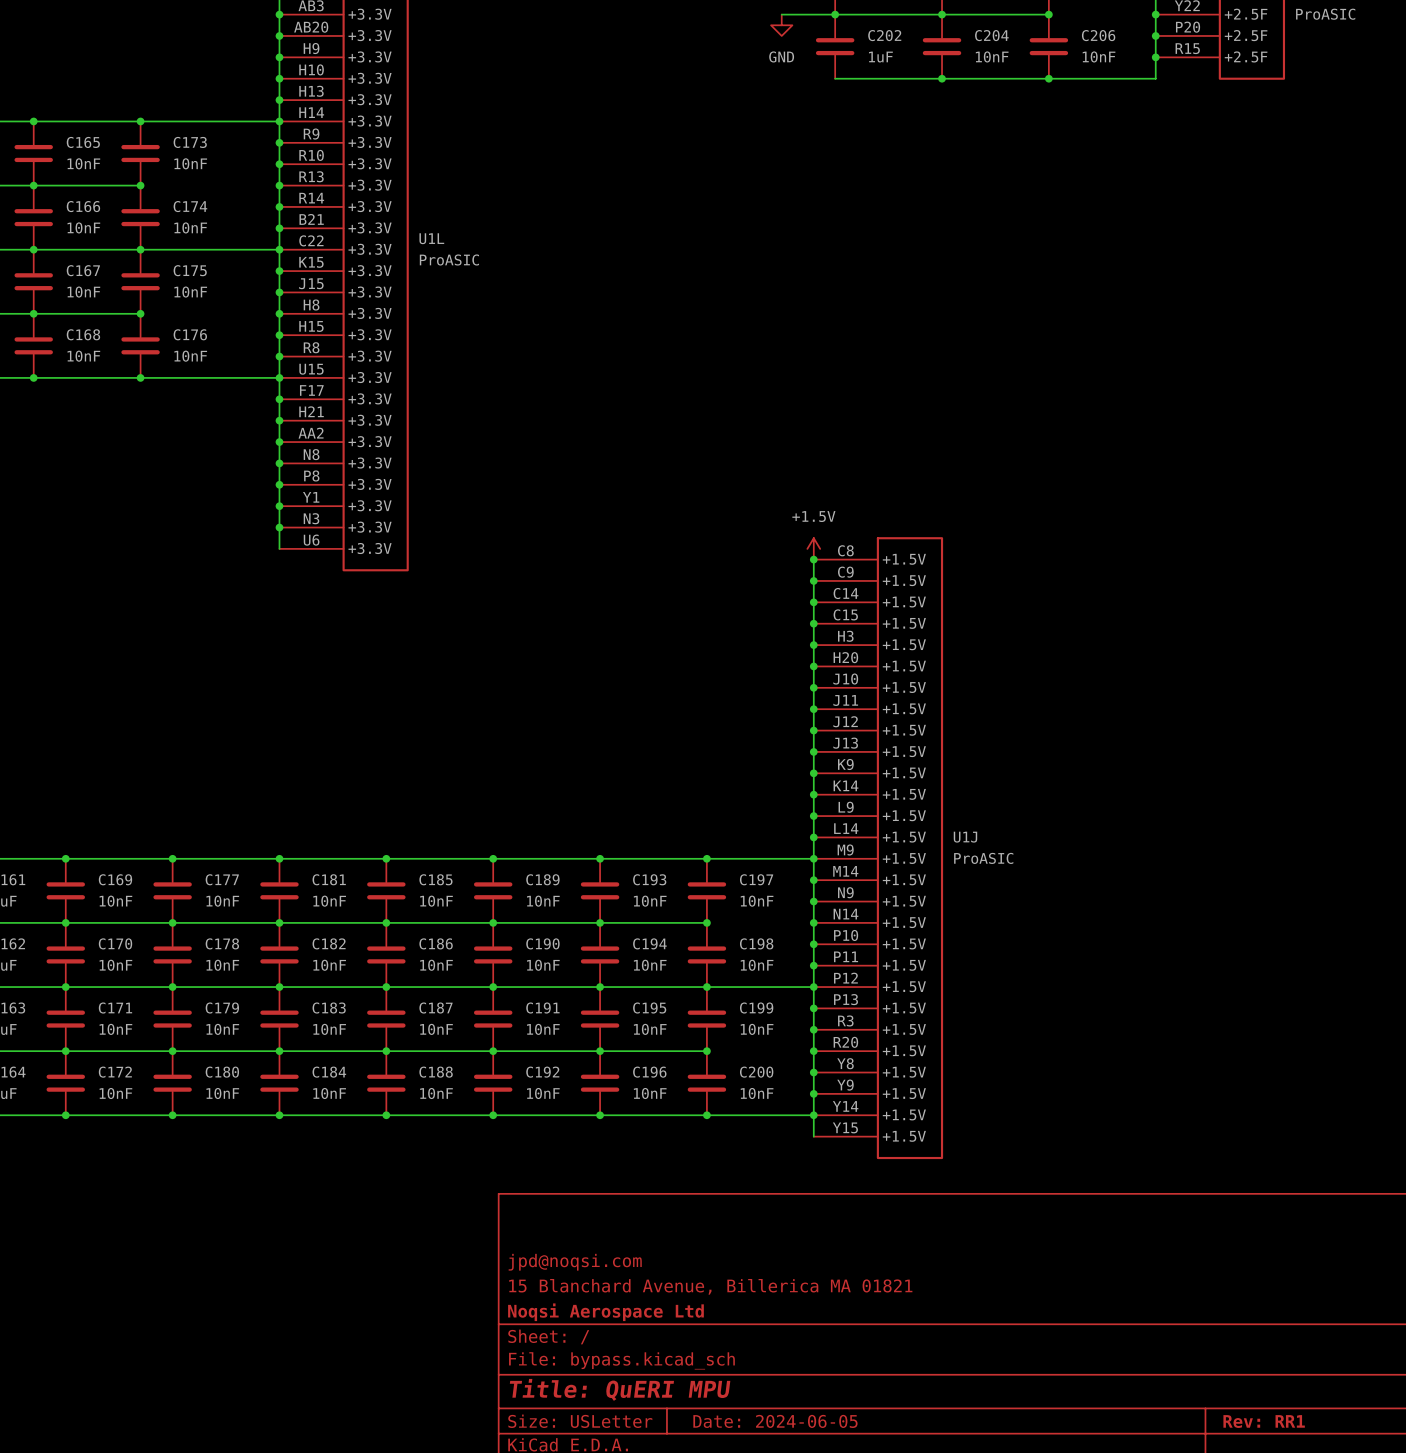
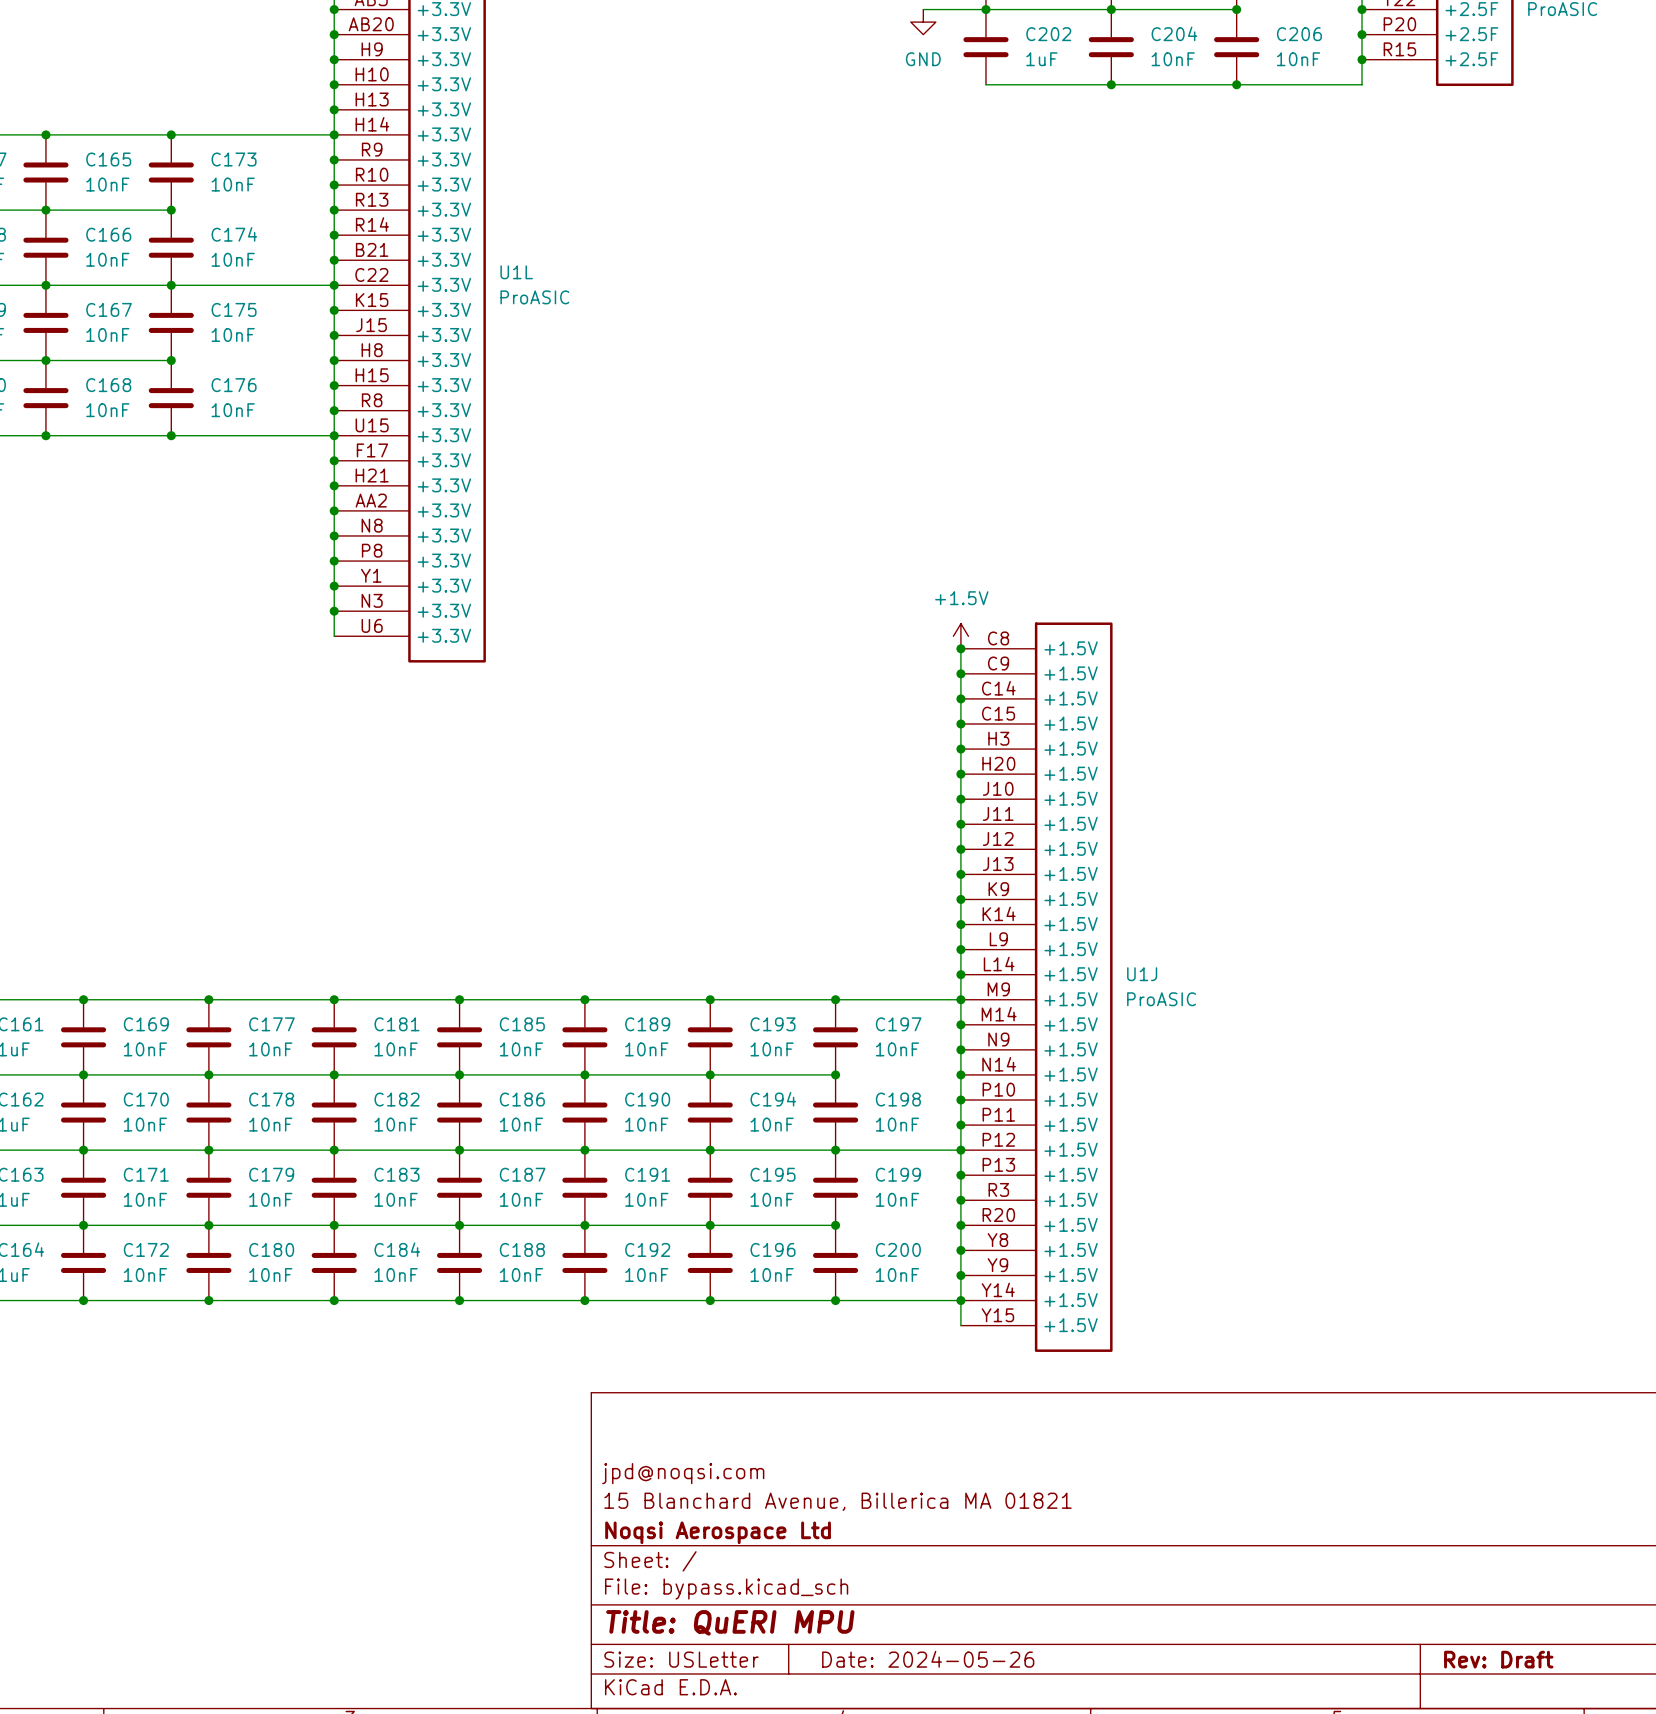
title block: Date: 2024-06-05 (775, 1421) -> Date: 2024-05-26 (928, 1659)
title block: Rev: RR1 (1264, 1421) -> Rev: Draft (1498, 1659)

